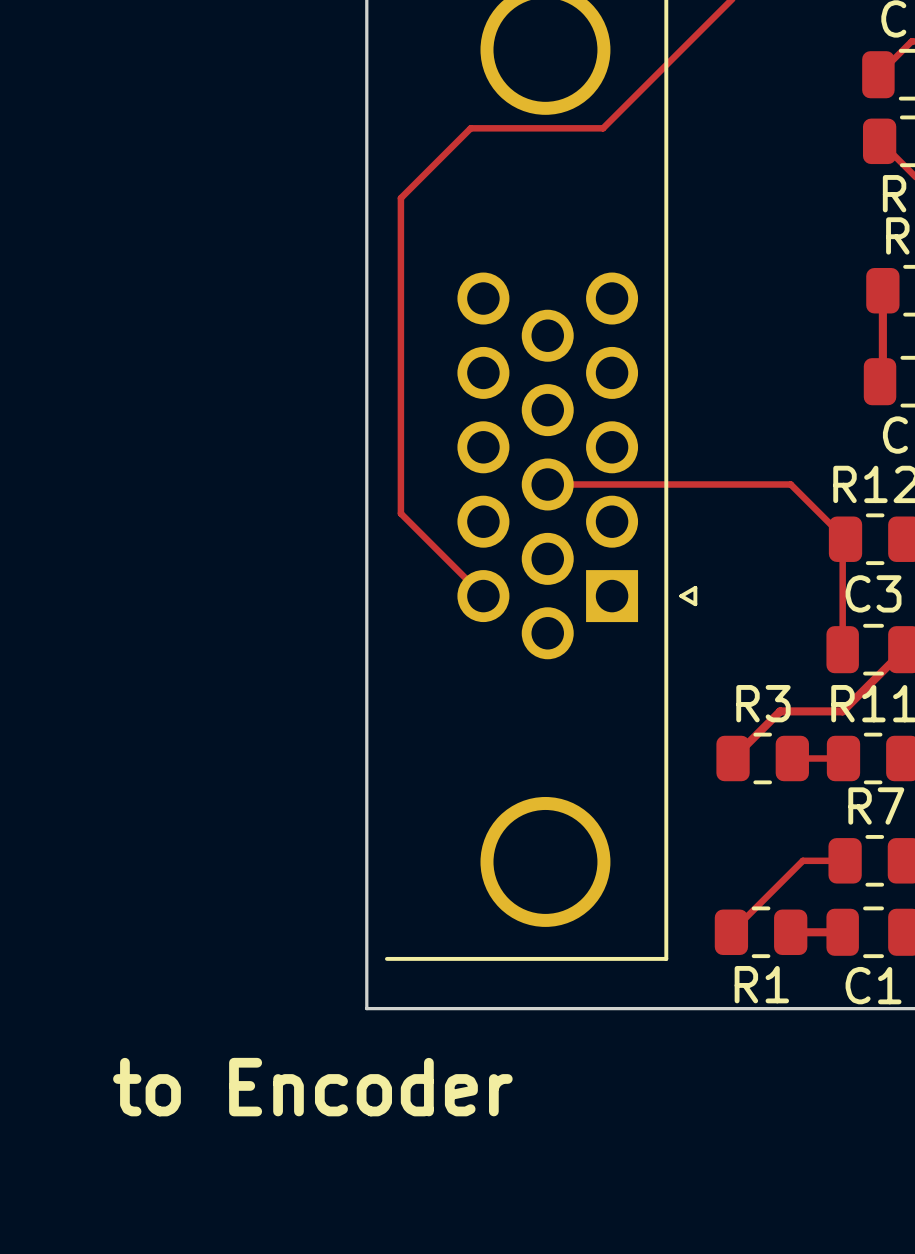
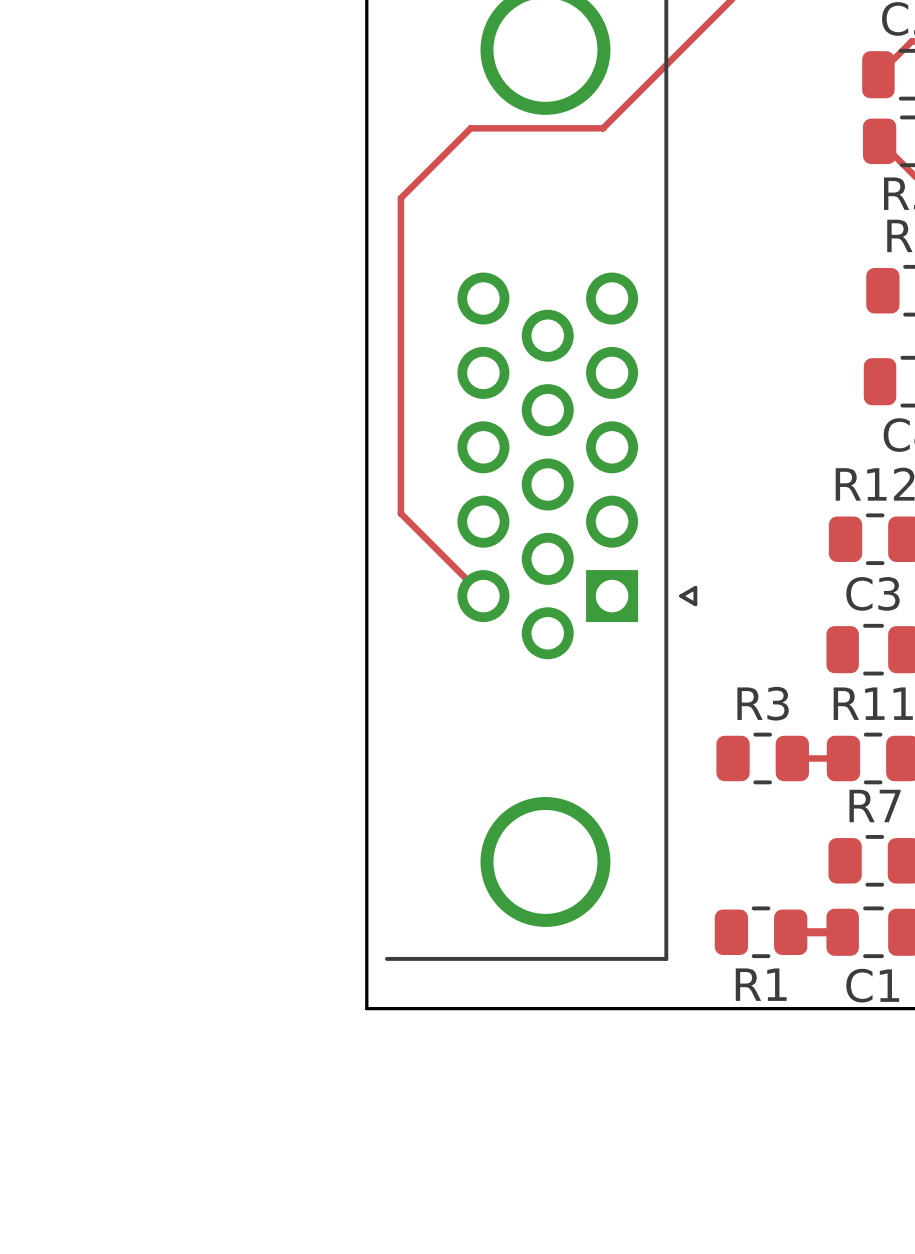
top track: (882, 290) (882, 378) (880, 381) -> none
top track: (547, 484) (790, 484) (845, 539) (842, 542) (842, 649) -> none
top track: (904, 649) (842, 711) (780, 711) (733, 758) -> none
top track: (845, 860) (802, 860) (731, 932) -> none
text: to Encoder (312, 1087) -> none

